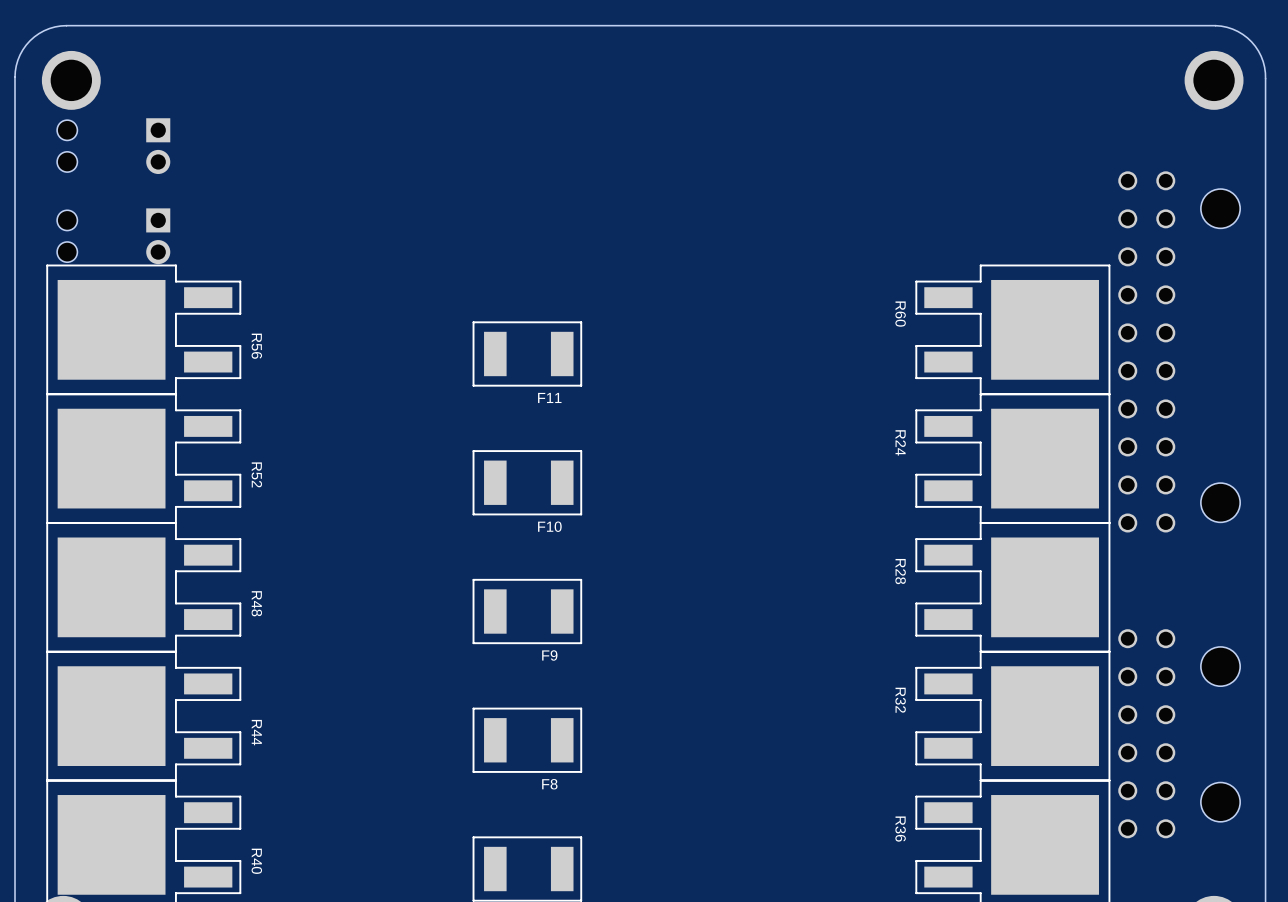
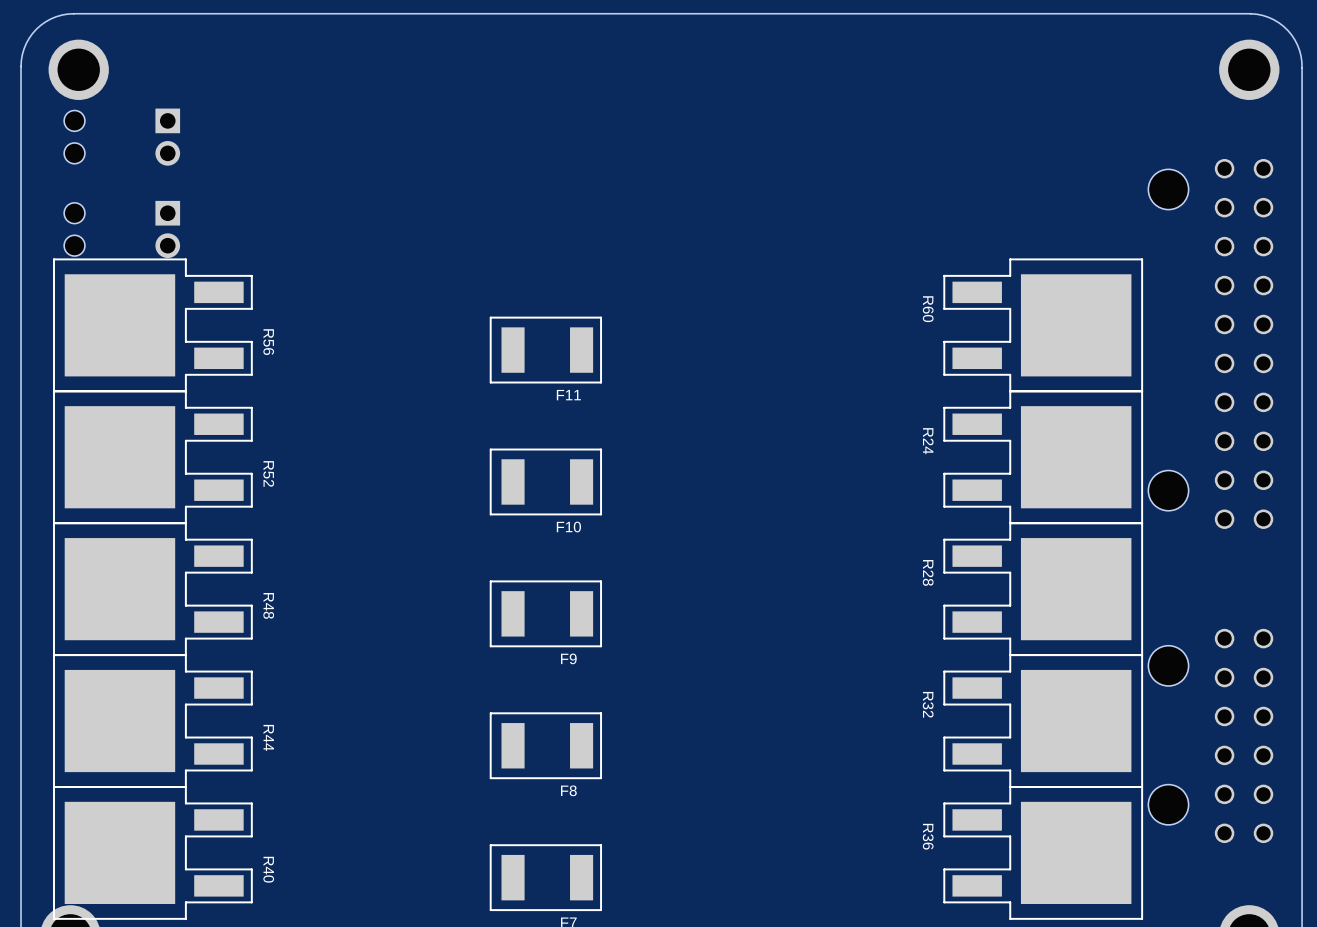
part rotation: 0° (1179, 351) -> 180° (1210, 343)
part rotation: 0° (1179, 733) -> 180° (1210, 735)

